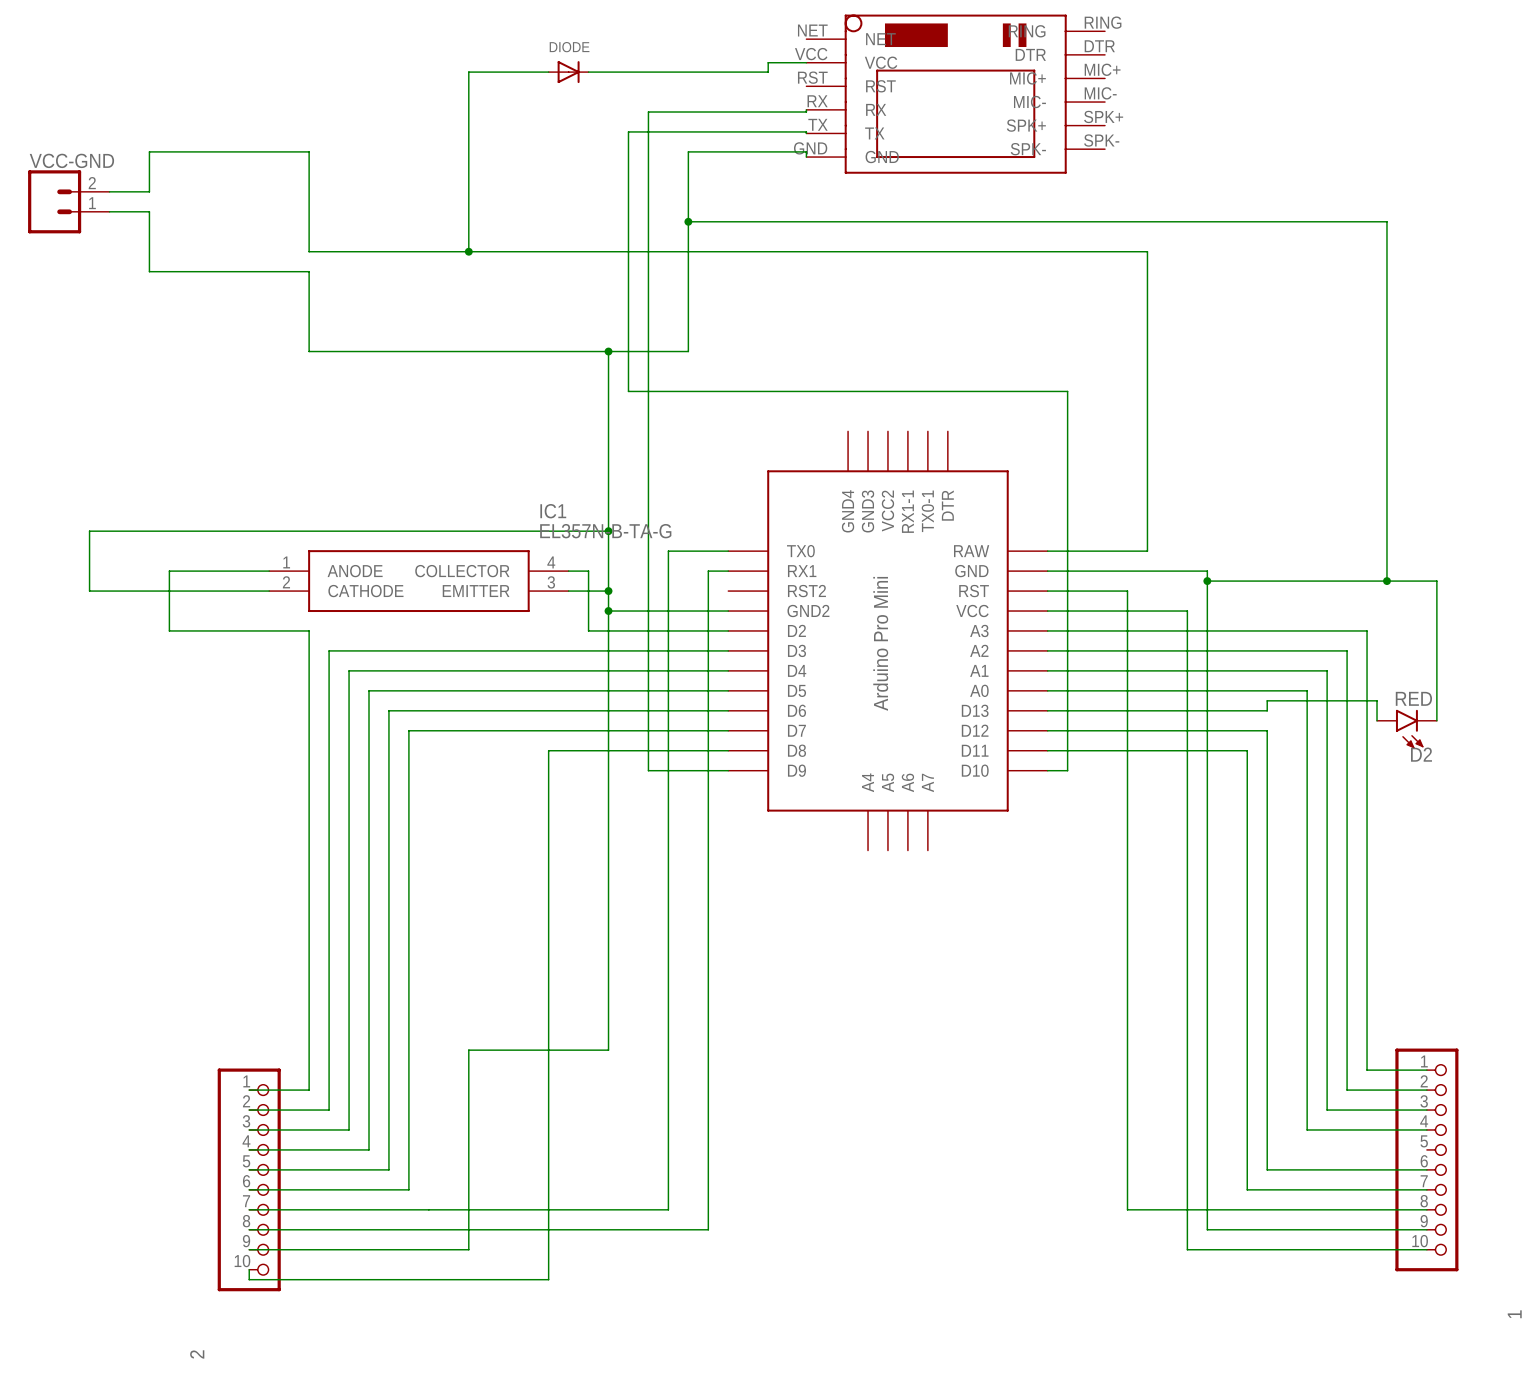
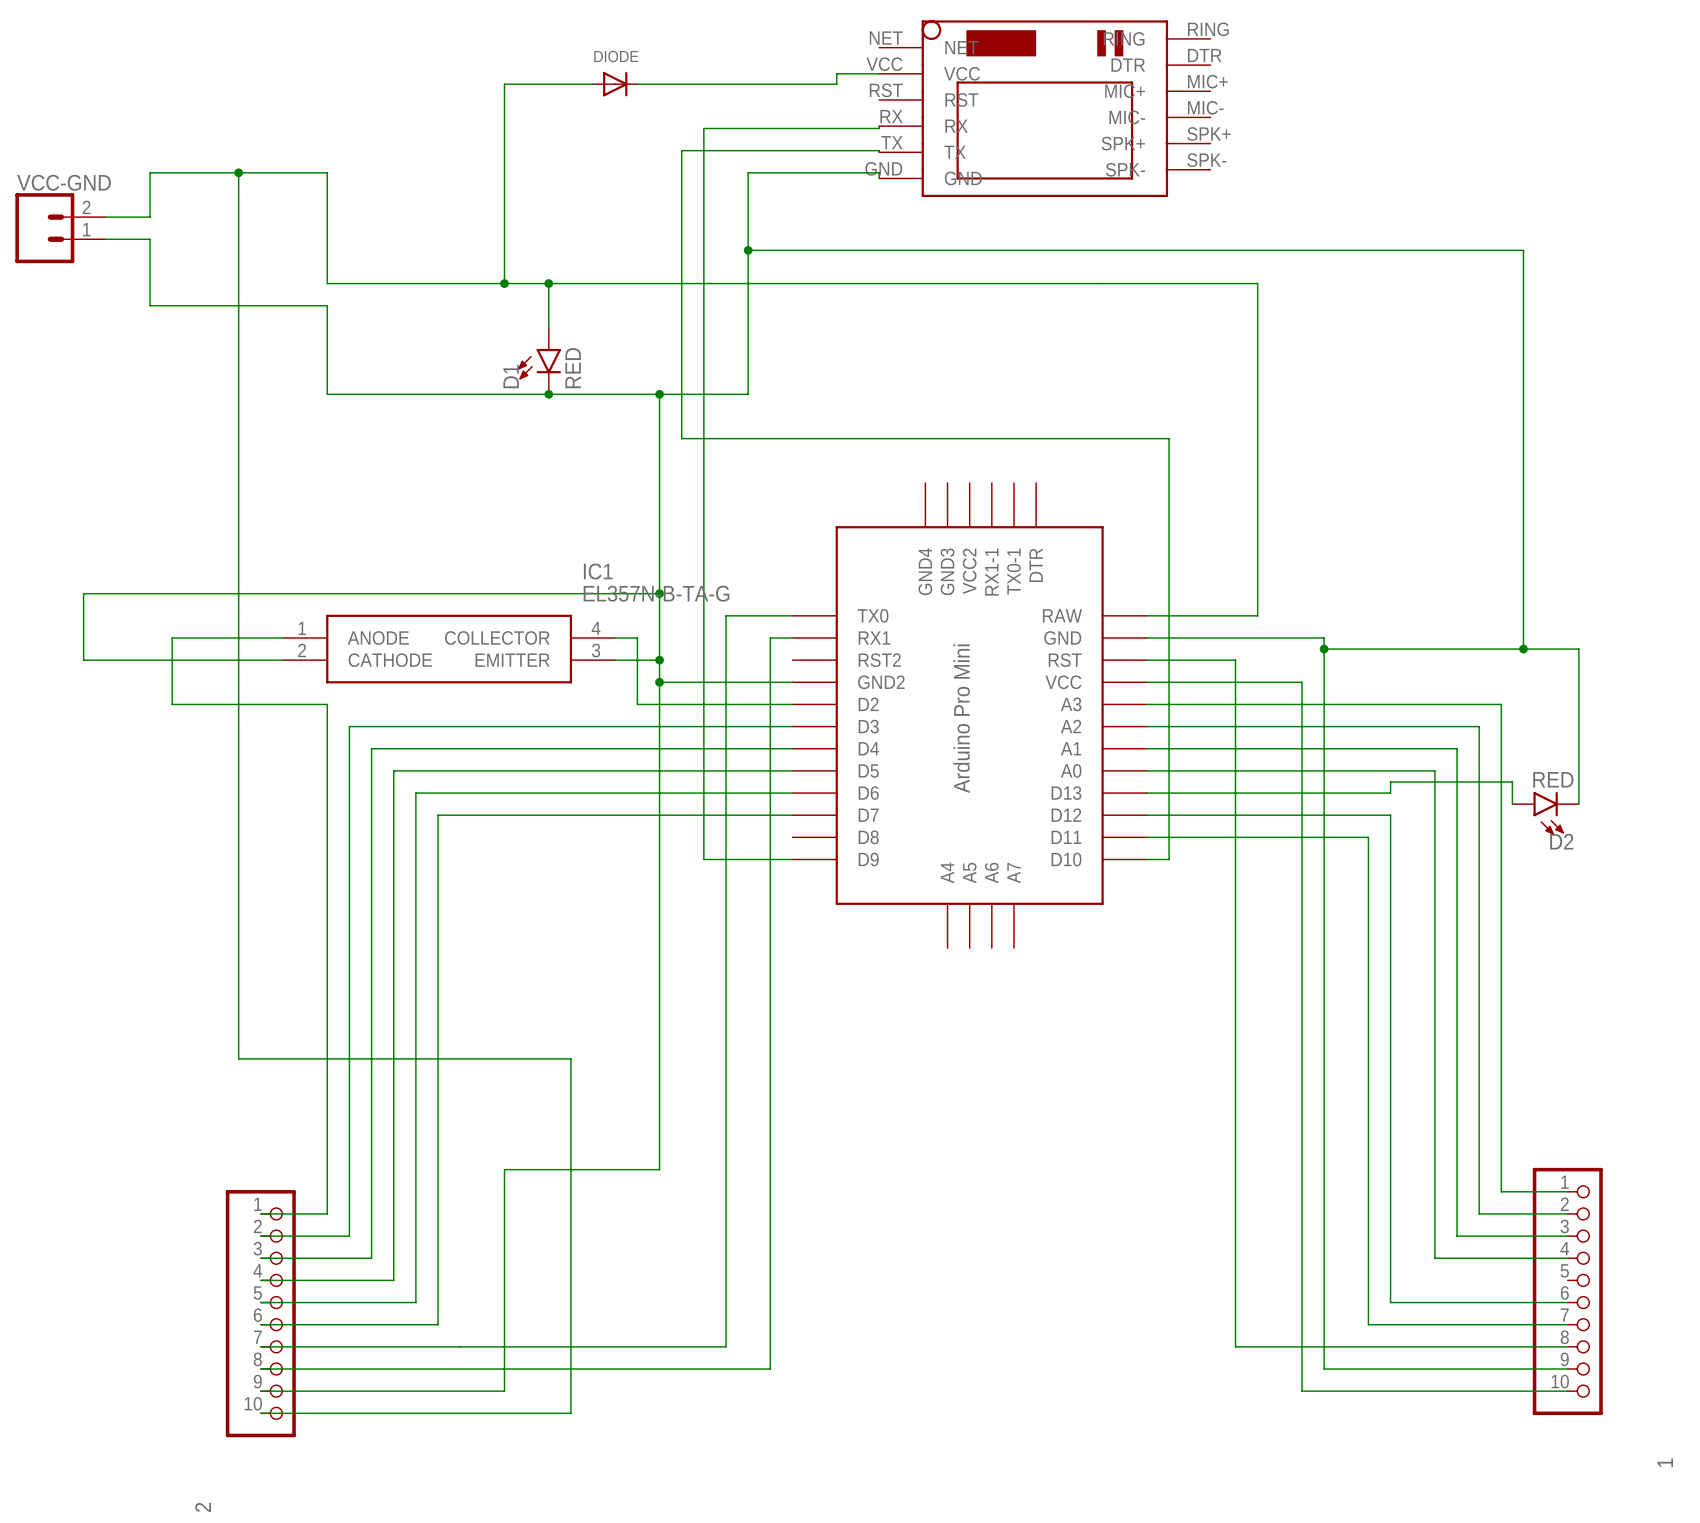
junction: none -> (238, 172)
wire: none -> (548, 283) (548, 327)
junction: none -> (548, 283)
D1: none -> RED (539, 361)
junction: none -> (548, 394)
wire: (728, 750) (548, 750) (548, 1279) (249, 1279) (249, 1269) -> (238, 172) (238, 1058) (570, 1058) (570, 1413) (260, 1413)

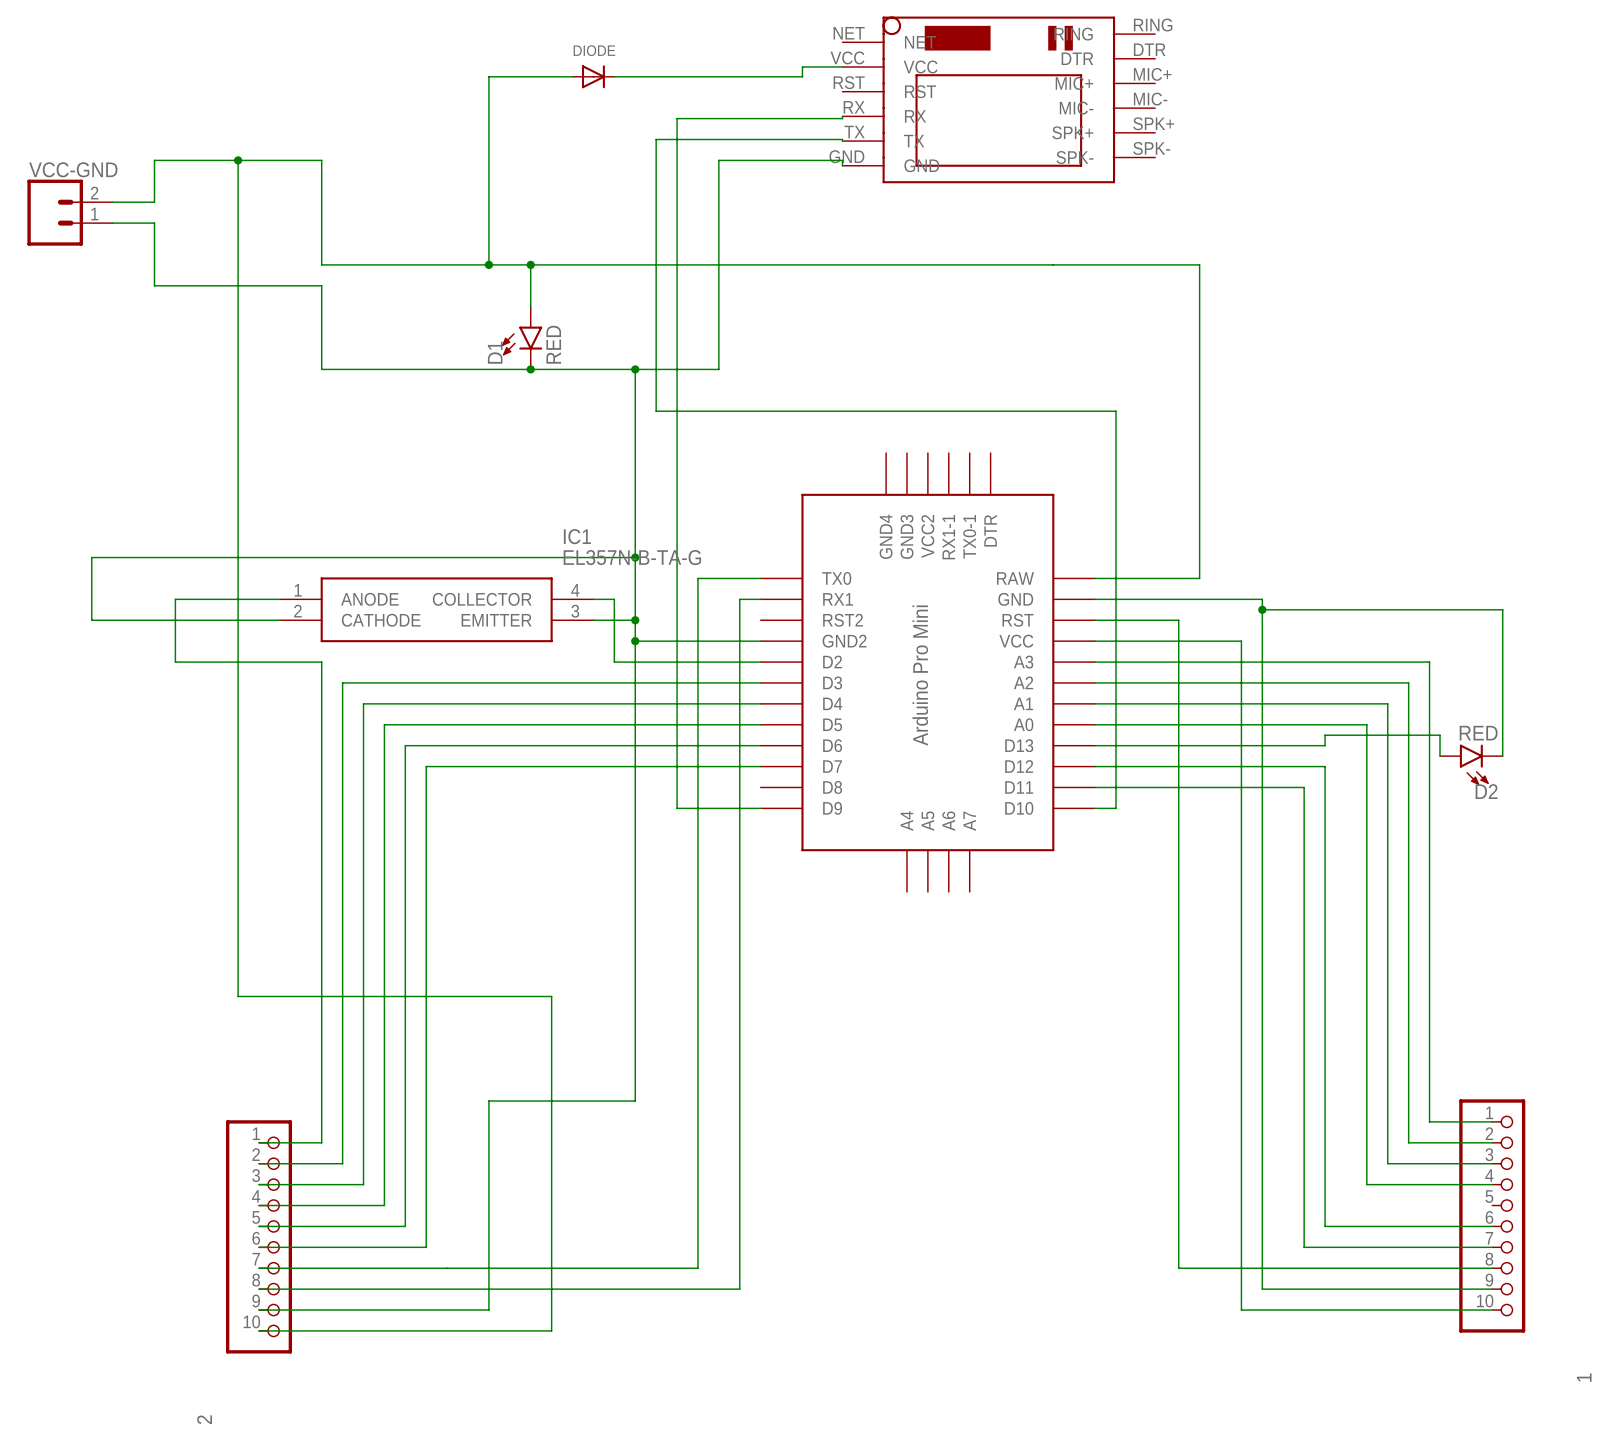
wire: (748, 250) (1523, 250) (1523, 649) -> none
junction: (748, 250) -> none
junction: (1523, 649) -> none

